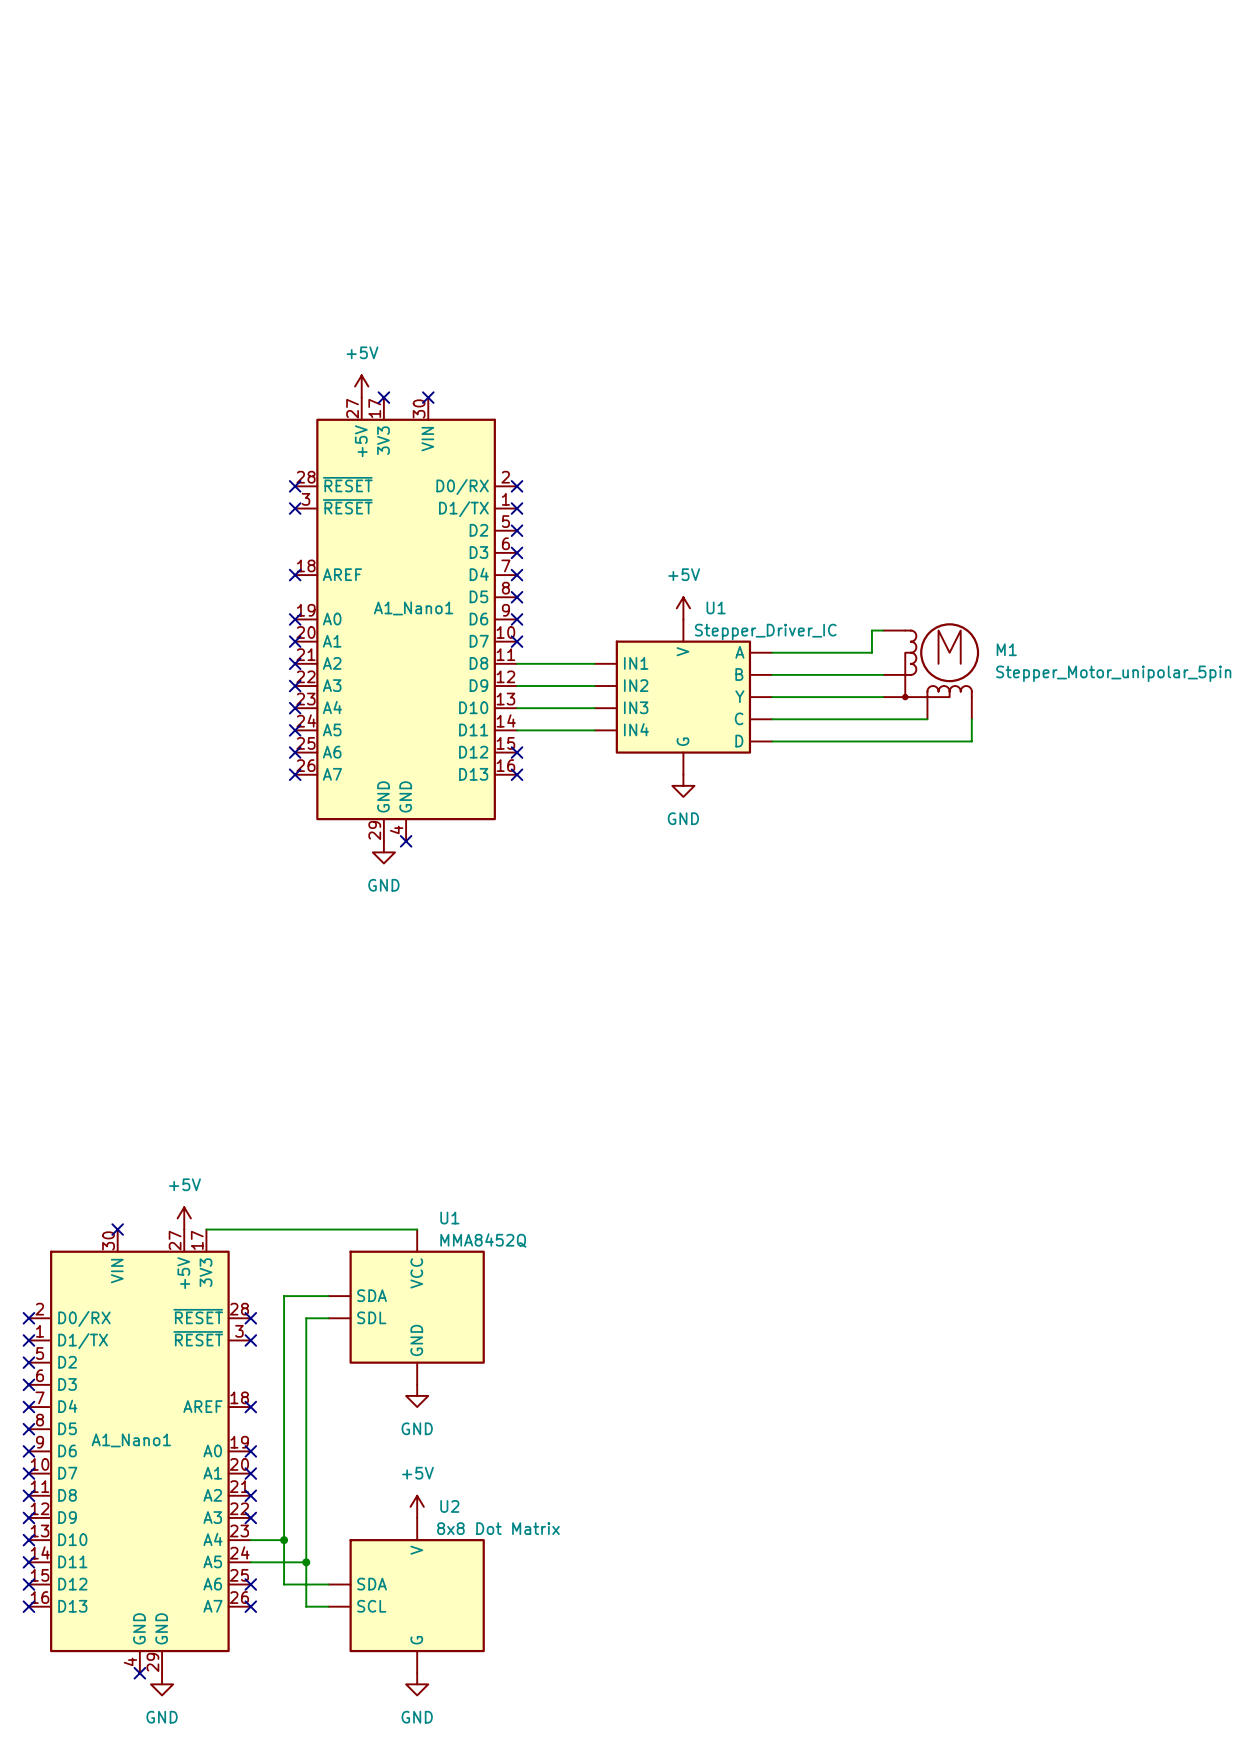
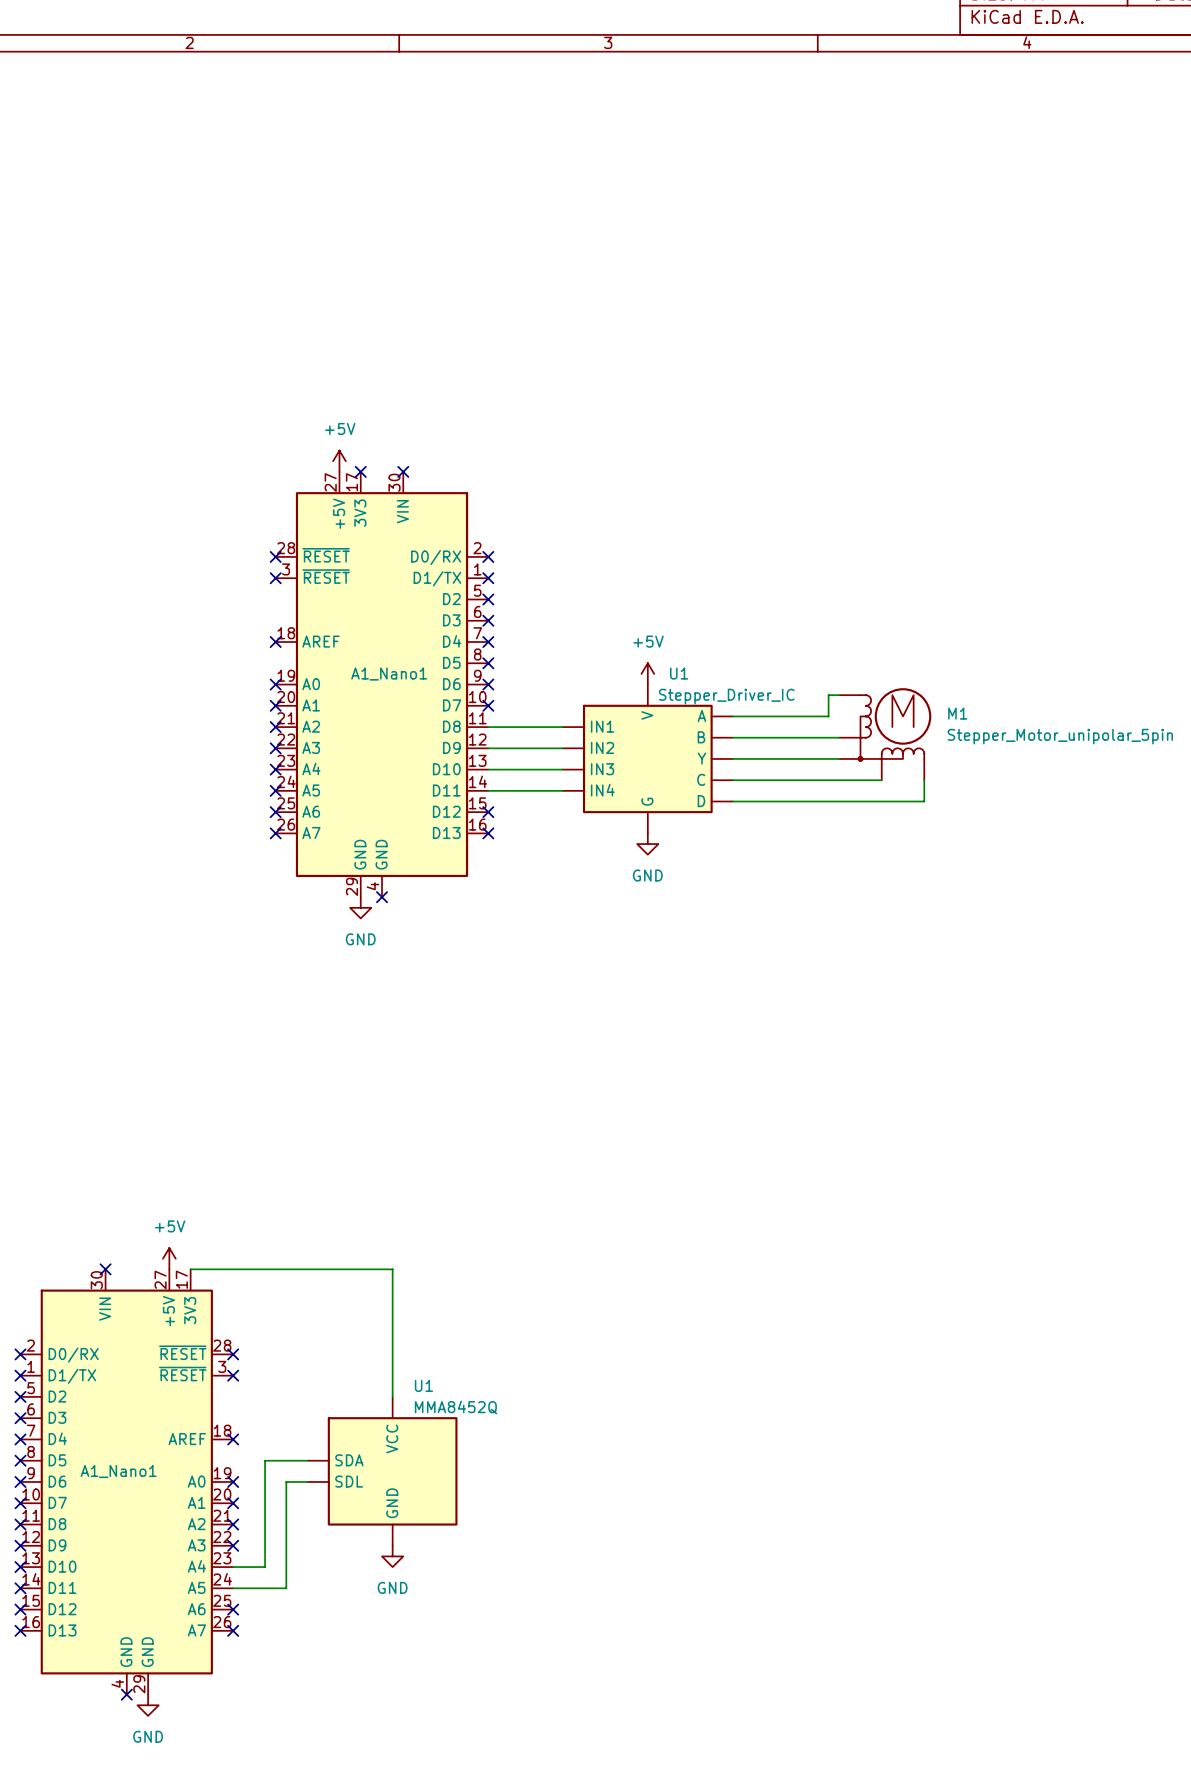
wire: (328, 1296) (284, 1296) (284, 1429) -> (307, 1460) (265, 1460)
U1 position: (406, 1307) -> (382, 1471)
wire: (328, 1318) (306, 1318) (306, 1451) -> (307, 1481) (286, 1481)
power symbol: GND (417, 1395) -> none
power symbol: +5V (417, 1506) -> none
power symbol: none -> GND (392, 1556)
wire: (284, 1540) (284, 1584) (328, 1584) -> none
junction: (284, 1540) -> none
wire: (306, 1562) (306, 1606) (328, 1606) -> none
junction: (306, 1562) -> none
U2: 8x8 Dot Matrix (406, 1595) -> none
power symbol: GND (417, 1684) -> none

